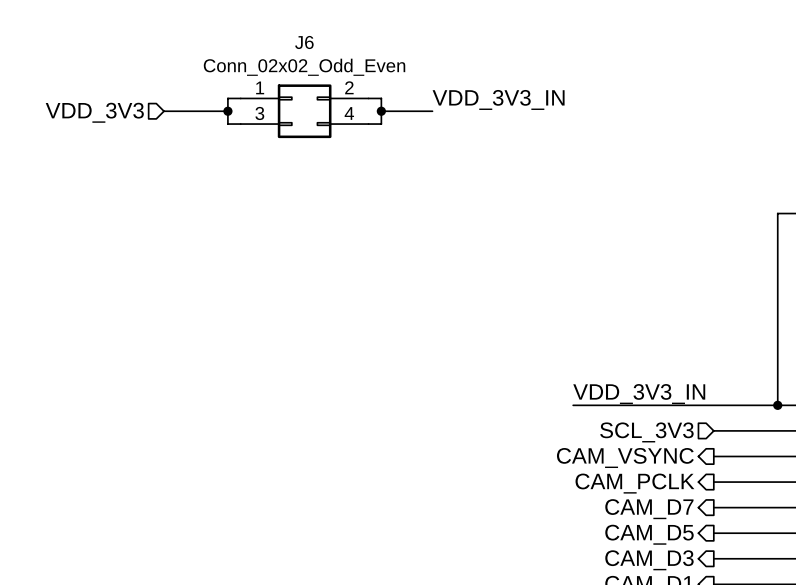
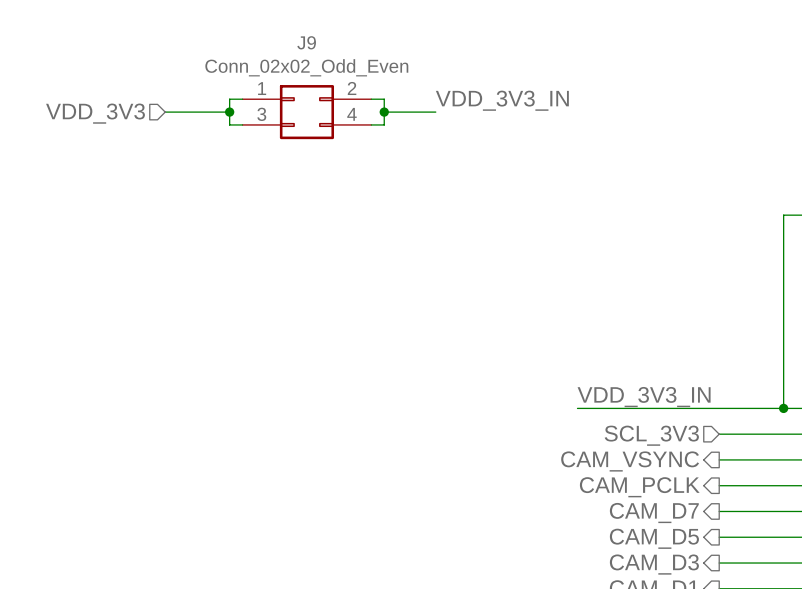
J6 name: J6 (304, 42) -> J9 (306, 42)

